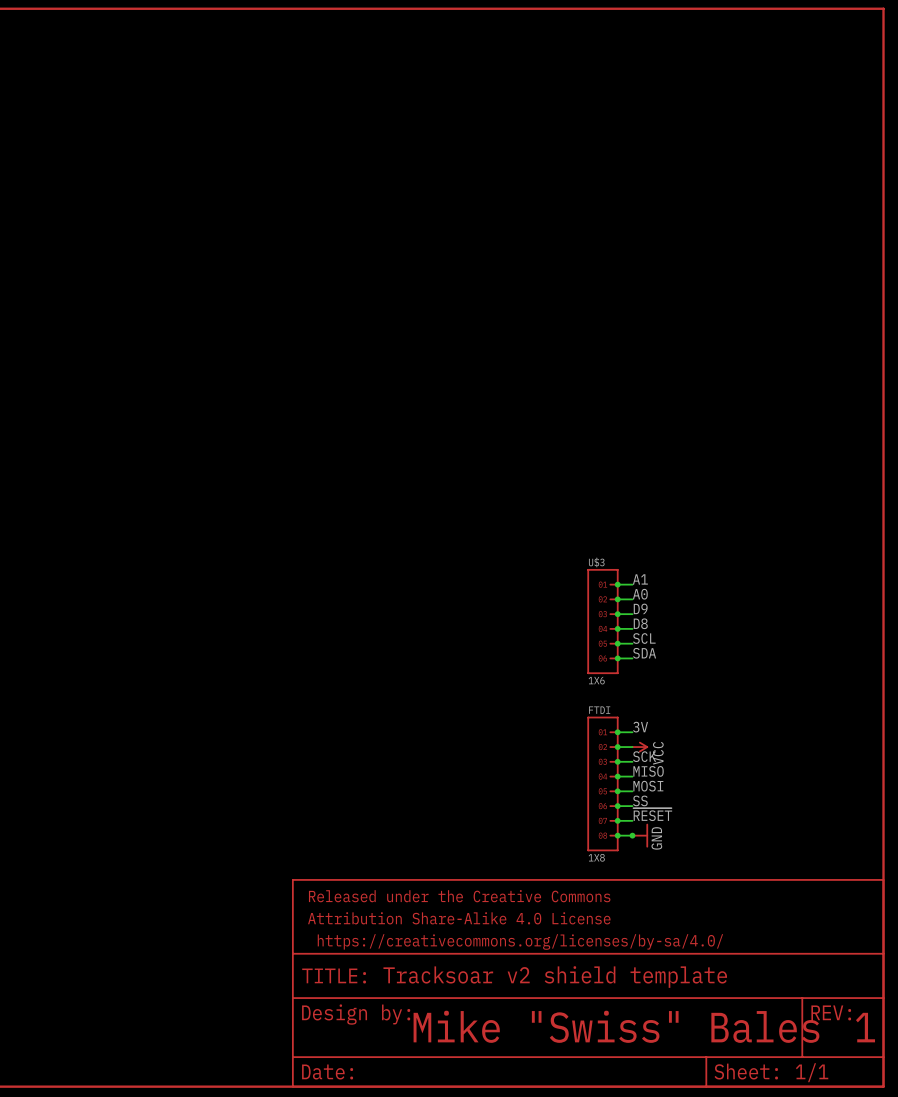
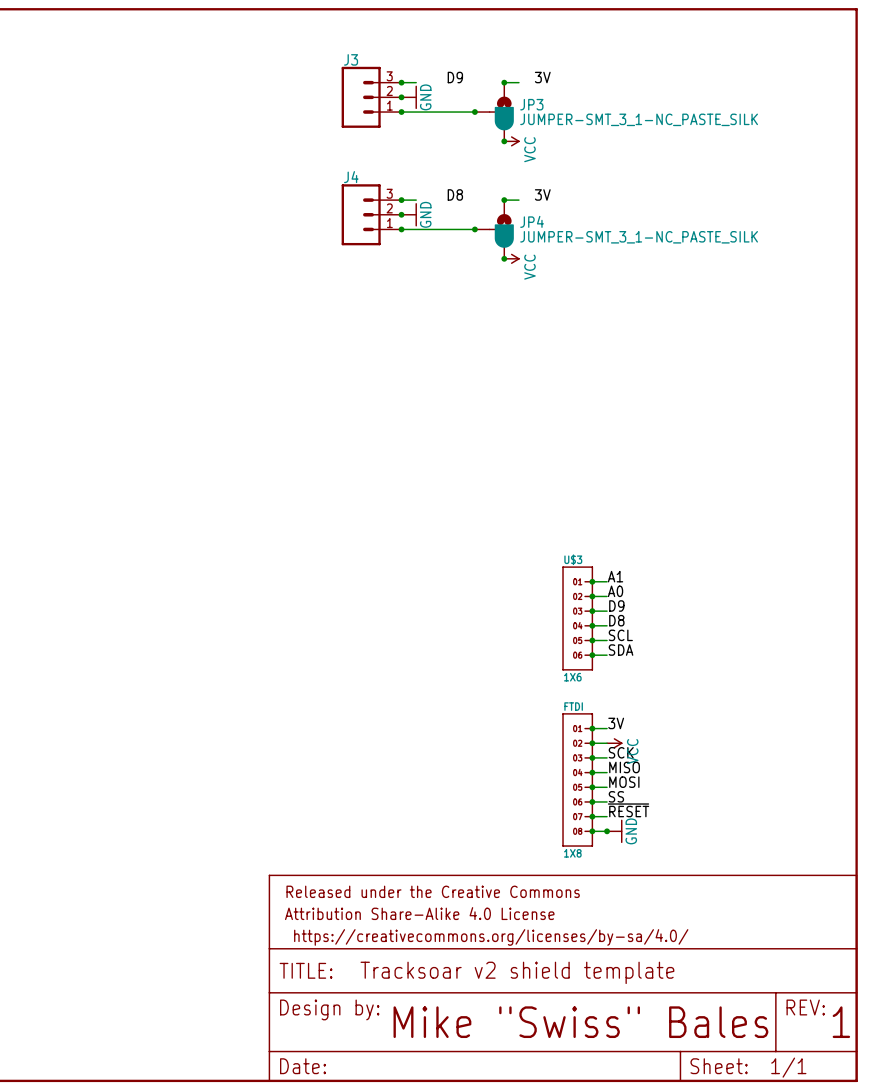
label: none -> D9 (455, 77)
label: none -> 3V (542, 77)
wire: none -> (401, 82) (416, 82)
junction: none -> (401, 82)
wire: none -> (504, 82) (518, 82)
junction: none -> (504, 82)
J3: none -> (371, 97)
junction: none -> (401, 97)
power symbol: none -> GND (409, 97)
wire: none -> (401, 112) (474, 112)
junction: none -> (401, 112)
junction: none -> (474, 112)
JP3: none -> JUMPER-SMT_3_1-NC_PASTE_SILK (494, 112)
junction: none -> (504, 141)
power symbol: none -> VCC (512, 141)
label: none -> D8 (455, 194)
label: none -> 3V (542, 194)
wire: none -> (401, 200) (416, 200)
junction: none -> (401, 200)
wire: none -> (504, 200) (518, 200)
junction: none -> (504, 200)
J4: none -> (371, 214)
junction: none -> (401, 214)
power symbol: none -> GND (409, 214)
wire: none -> (401, 229) (474, 229)
junction: none -> (401, 229)
junction: none -> (474, 229)
JP4: none -> JUMPER-SMT_3_1-NC_PASTE_SILK (494, 229)
junction: none -> (504, 258)
power symbol: none -> VCC (512, 258)

